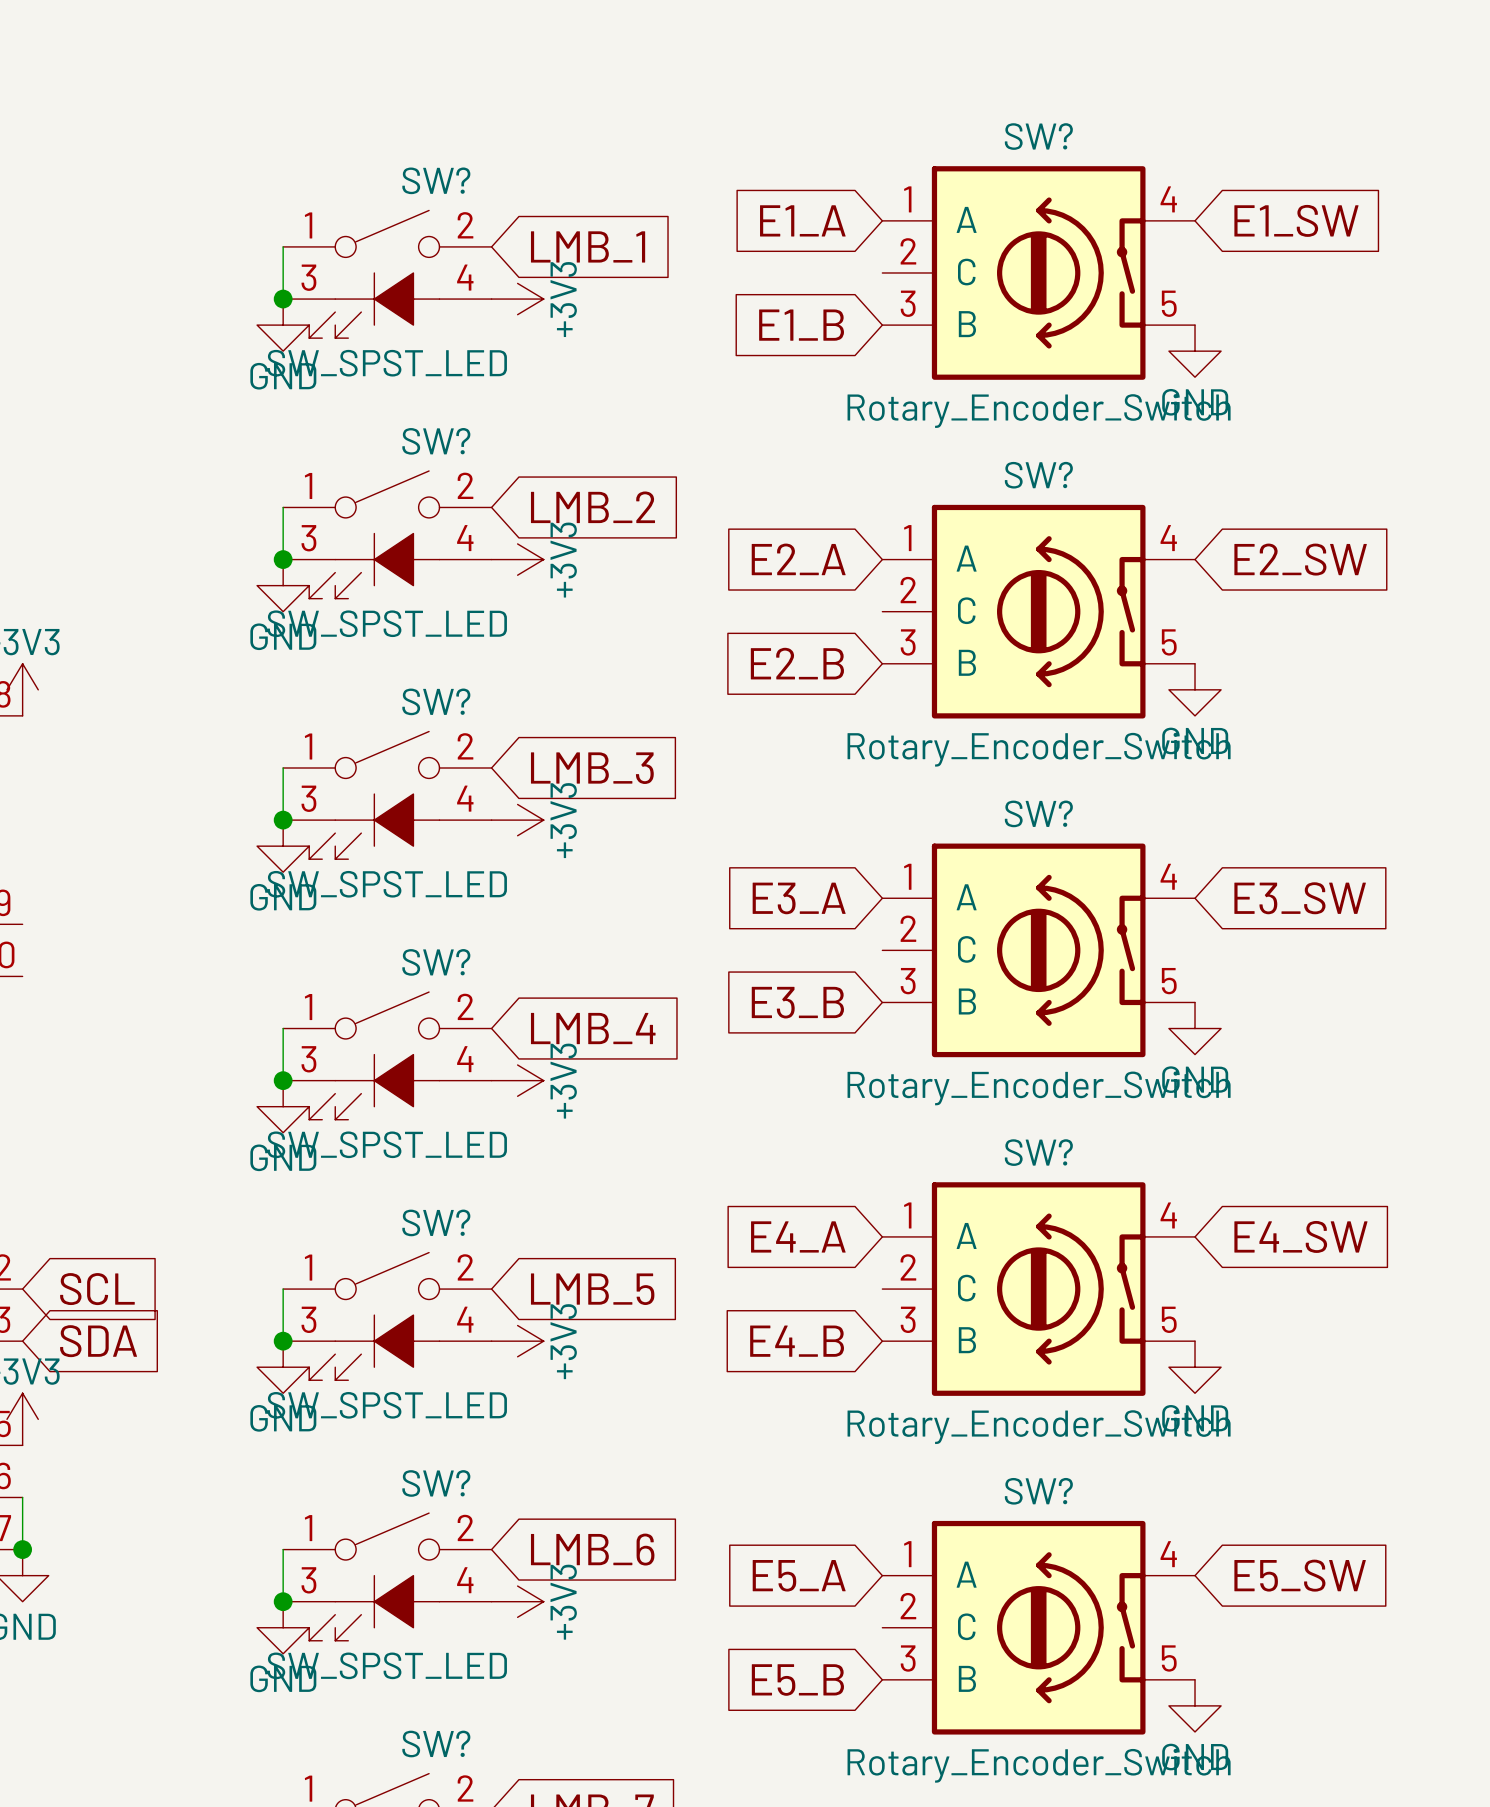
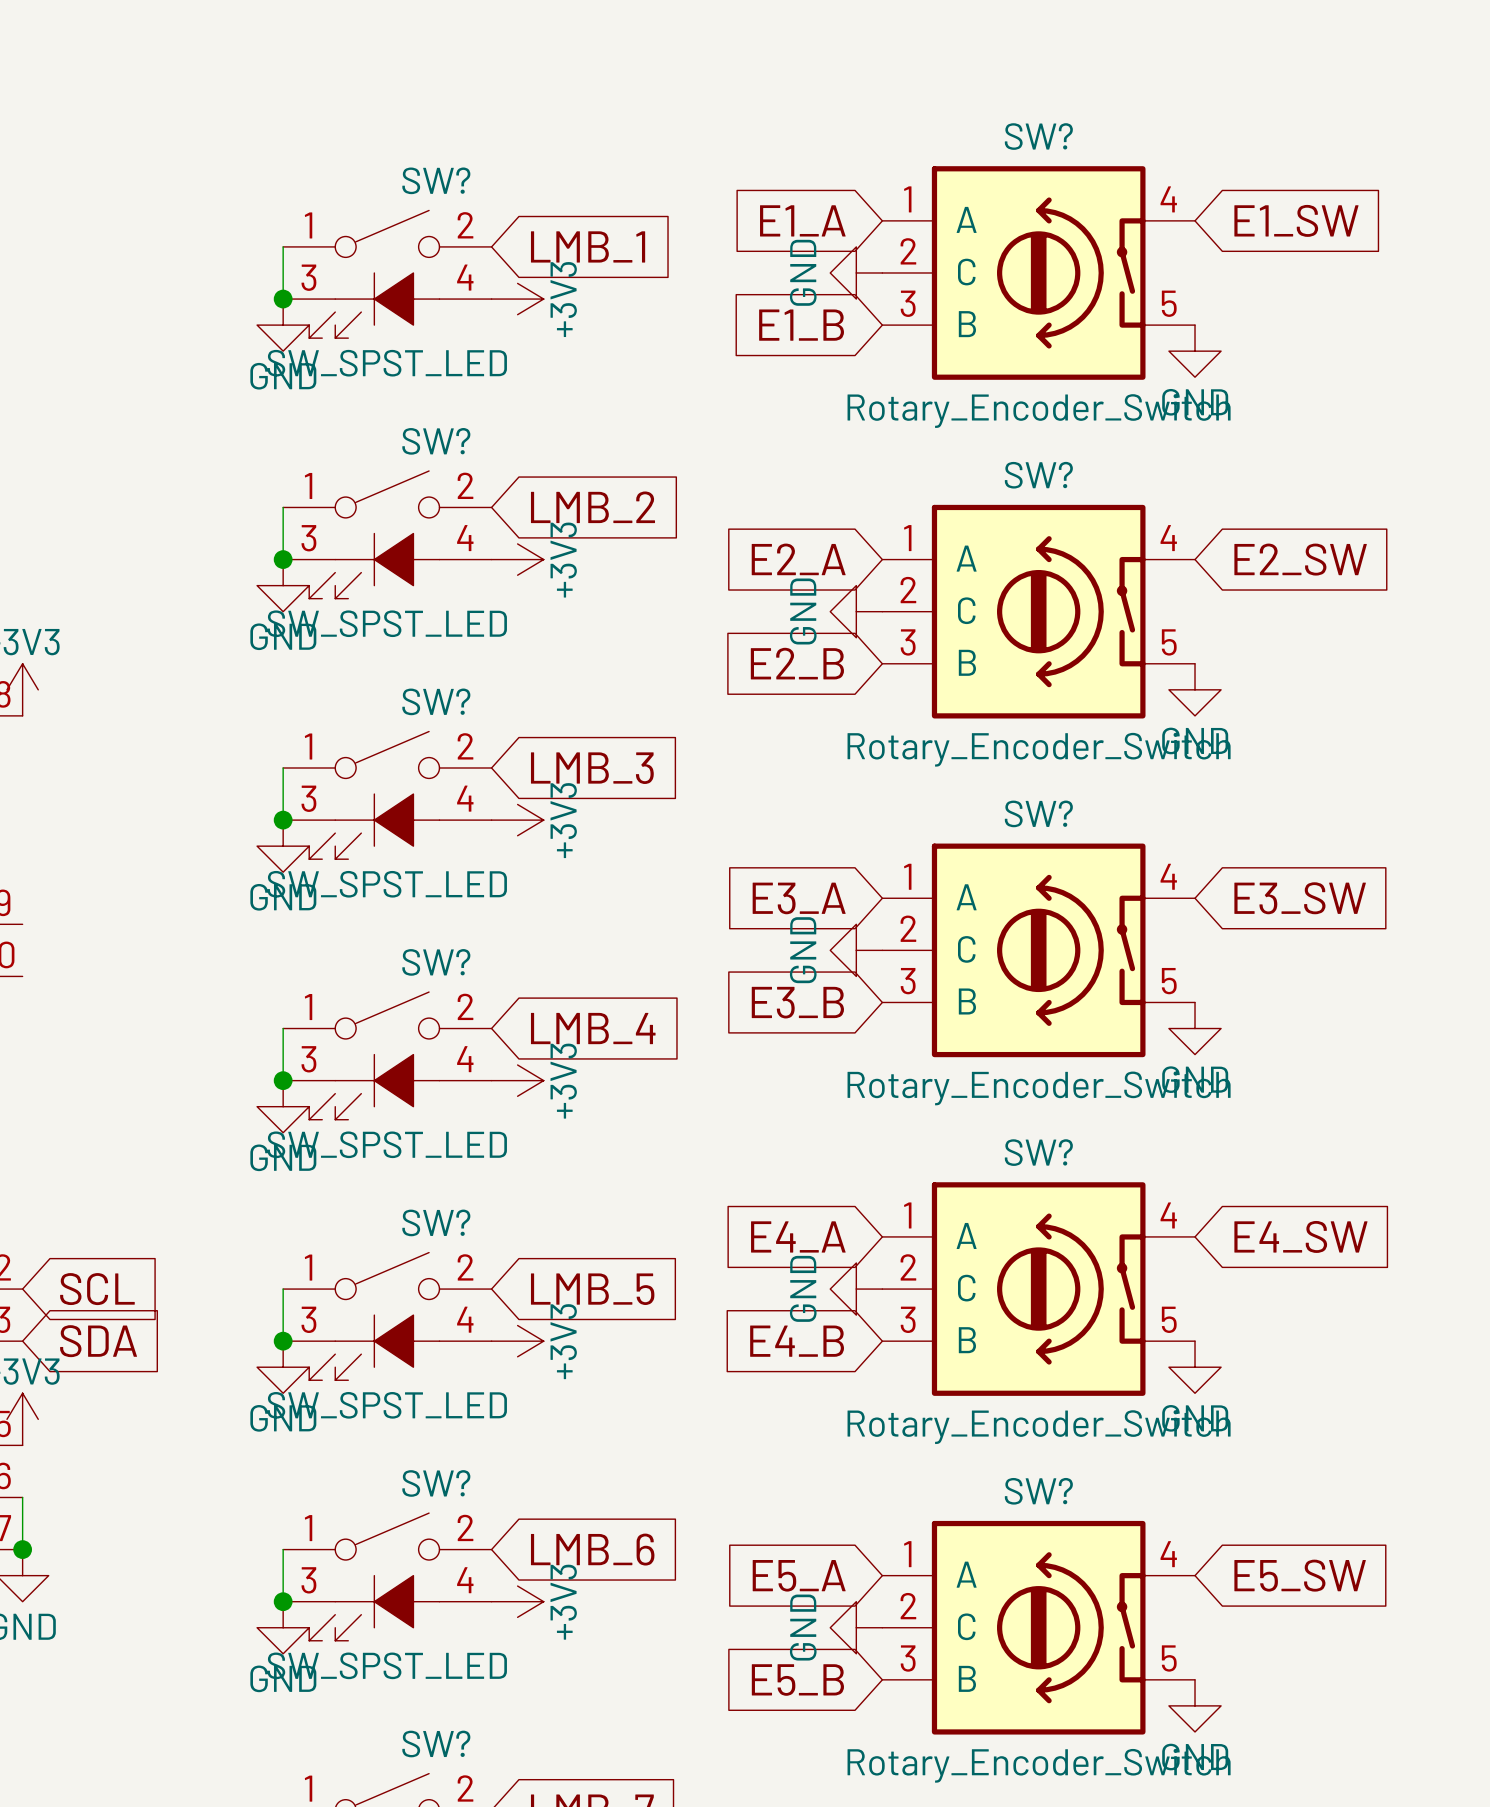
power symbol: none -> GND (856, 272)
power symbol: none -> GND (856, 611)
power symbol: none -> GND (856, 950)
power symbol: none -> GND (856, 1289)
power symbol: none -> GND (856, 1627)

